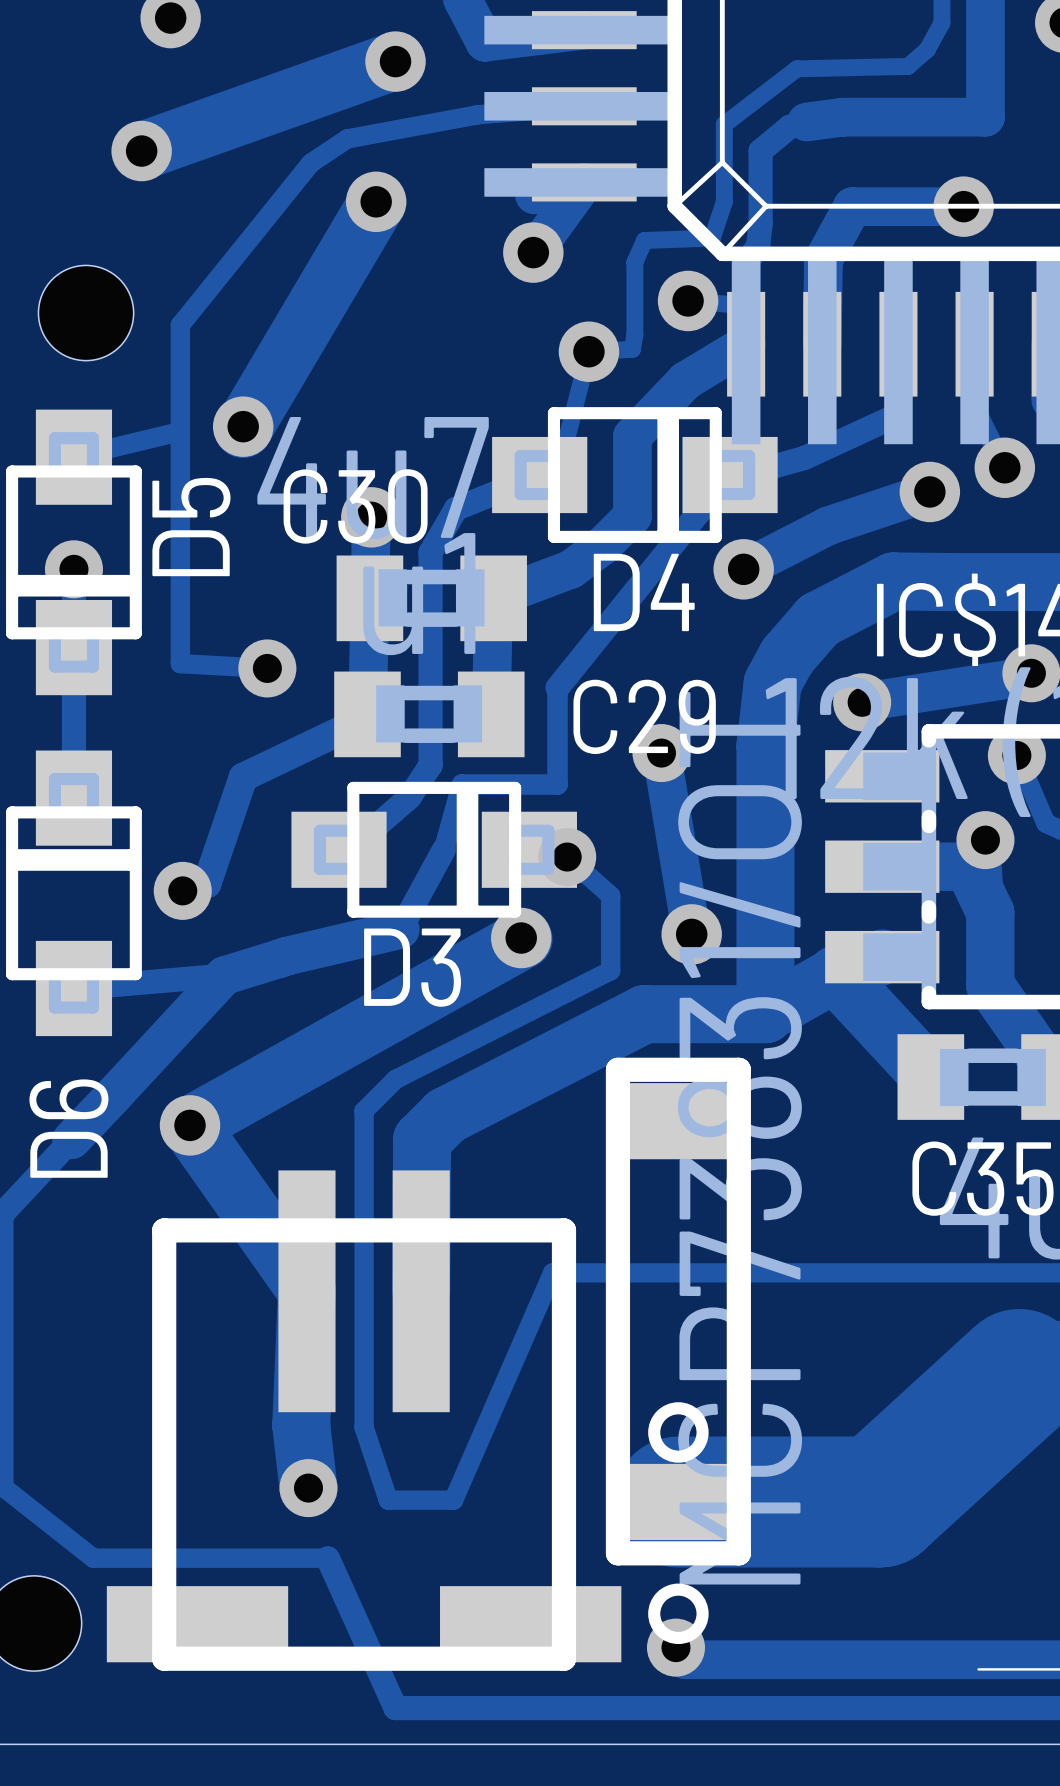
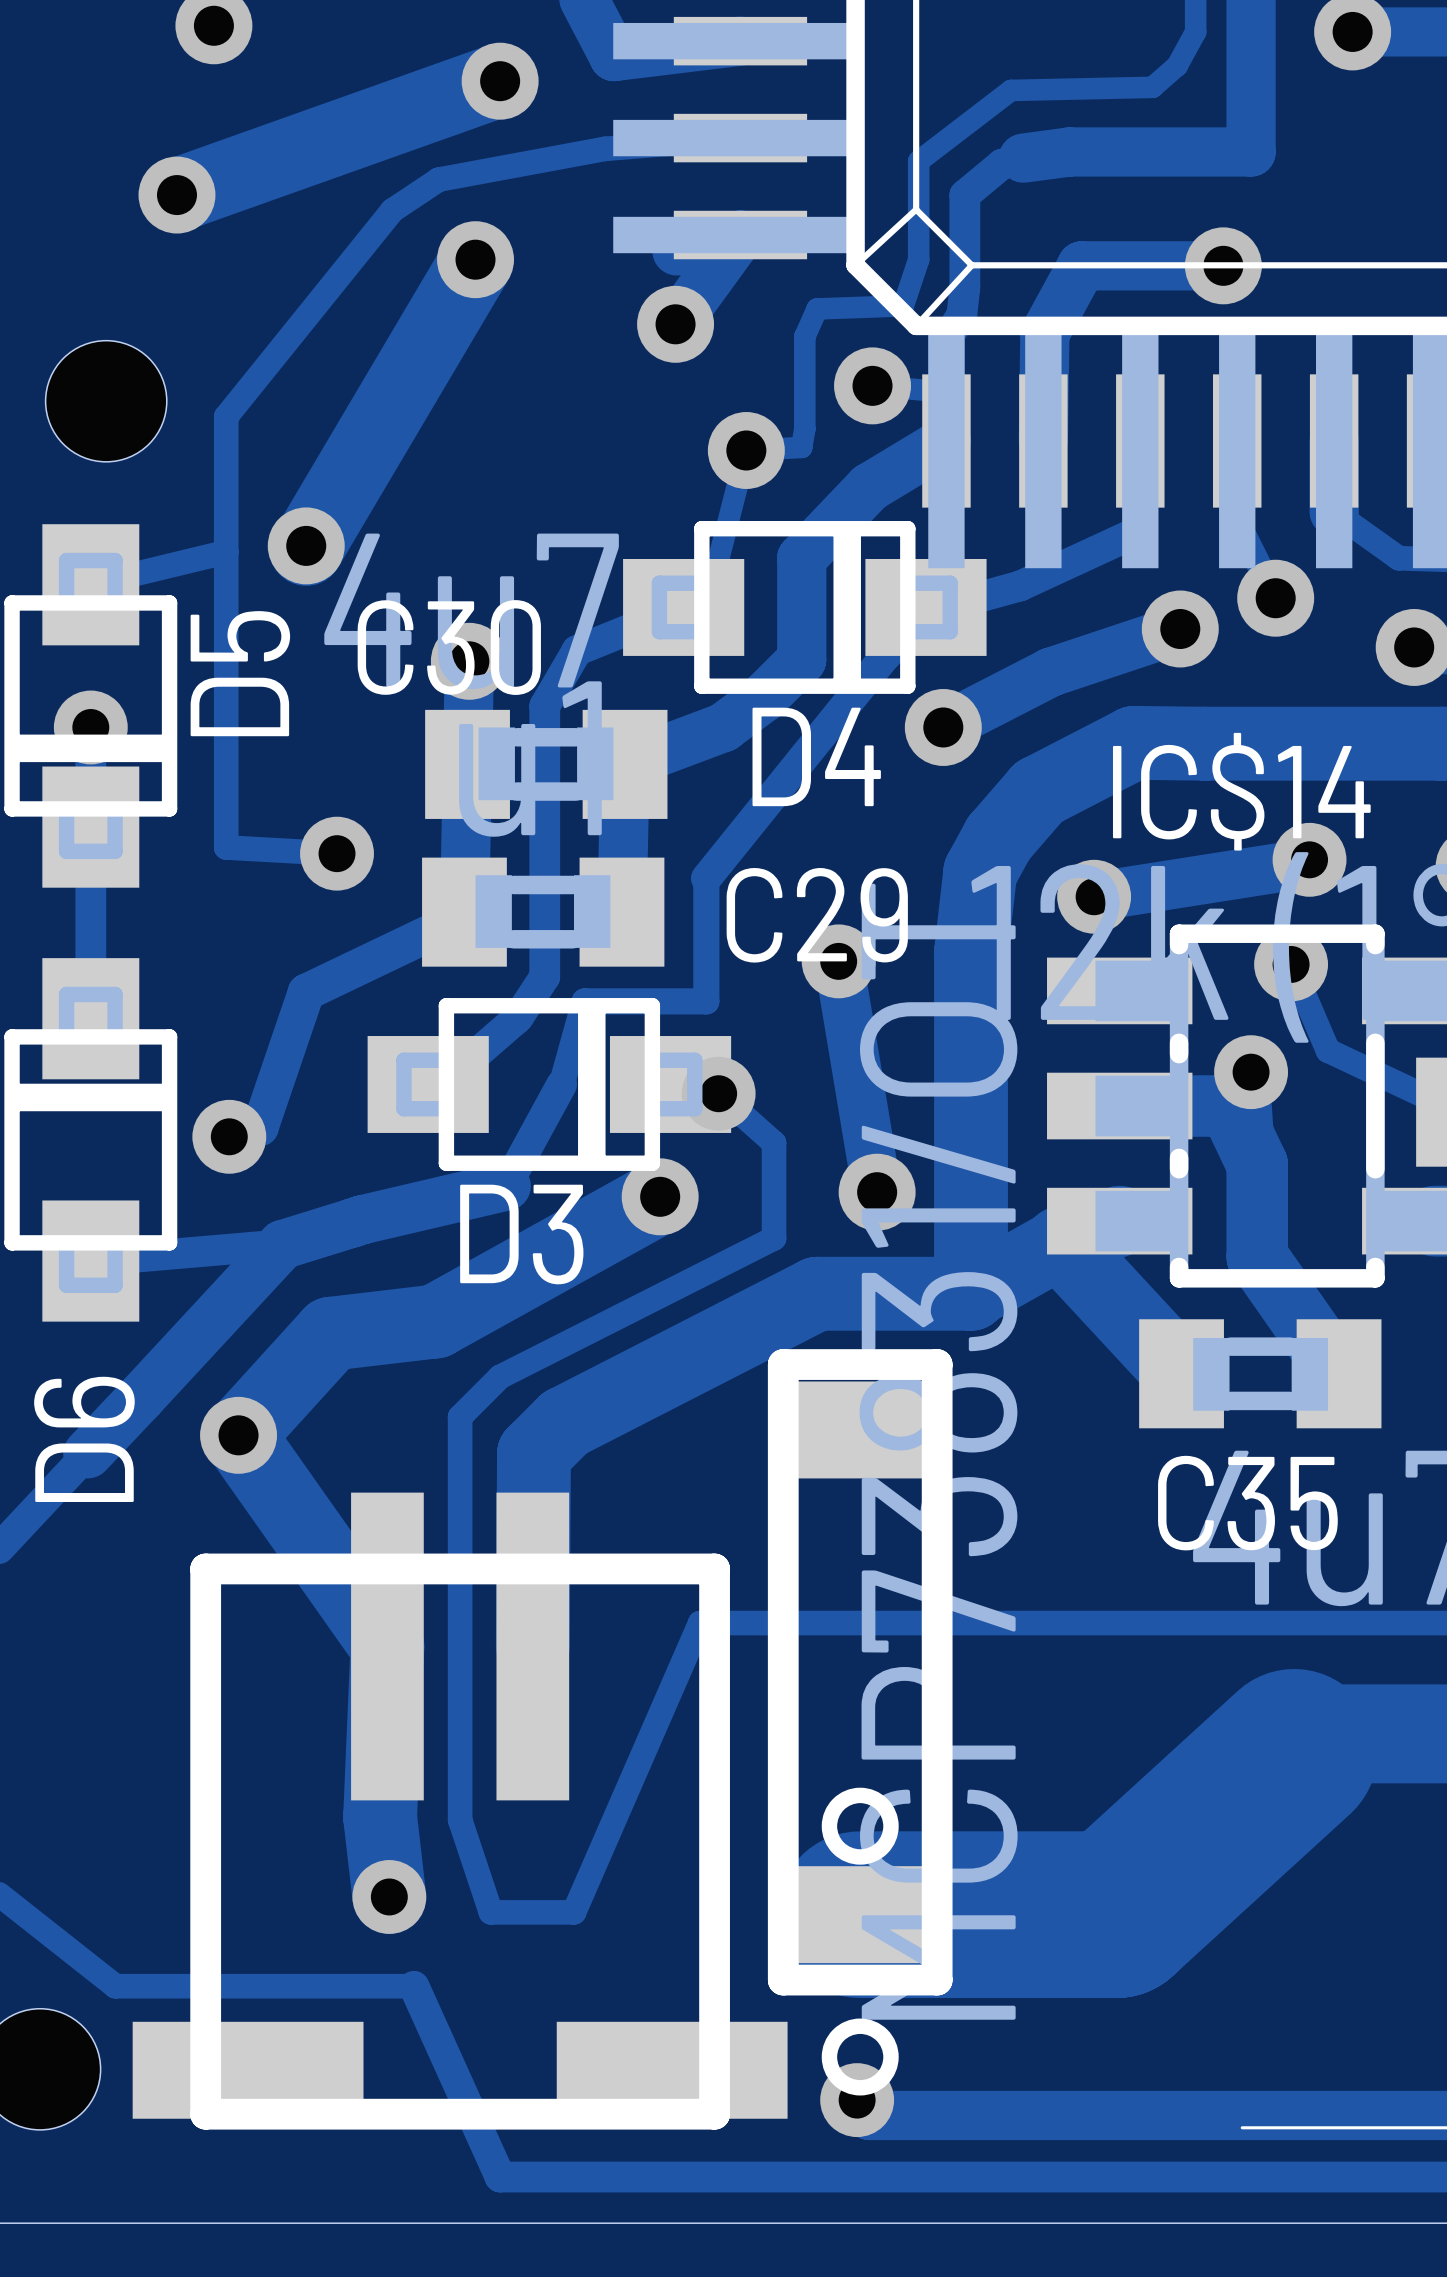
track: (523, 939) (190, 1125) -> (660, 1196) (435, 1321) (330, 1333) (238, 1435)

